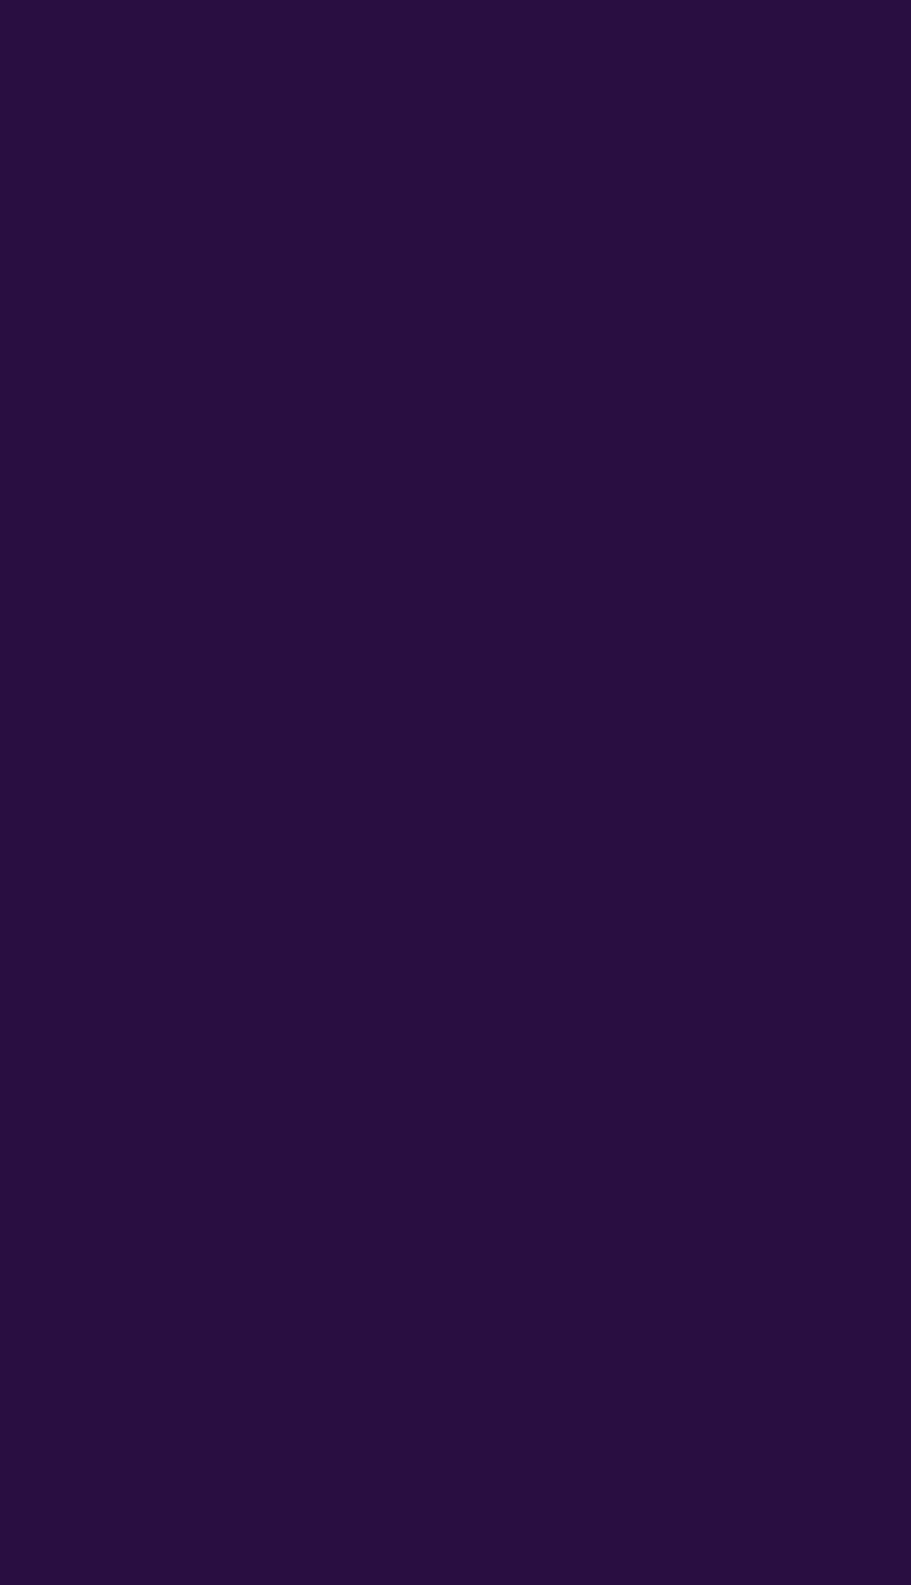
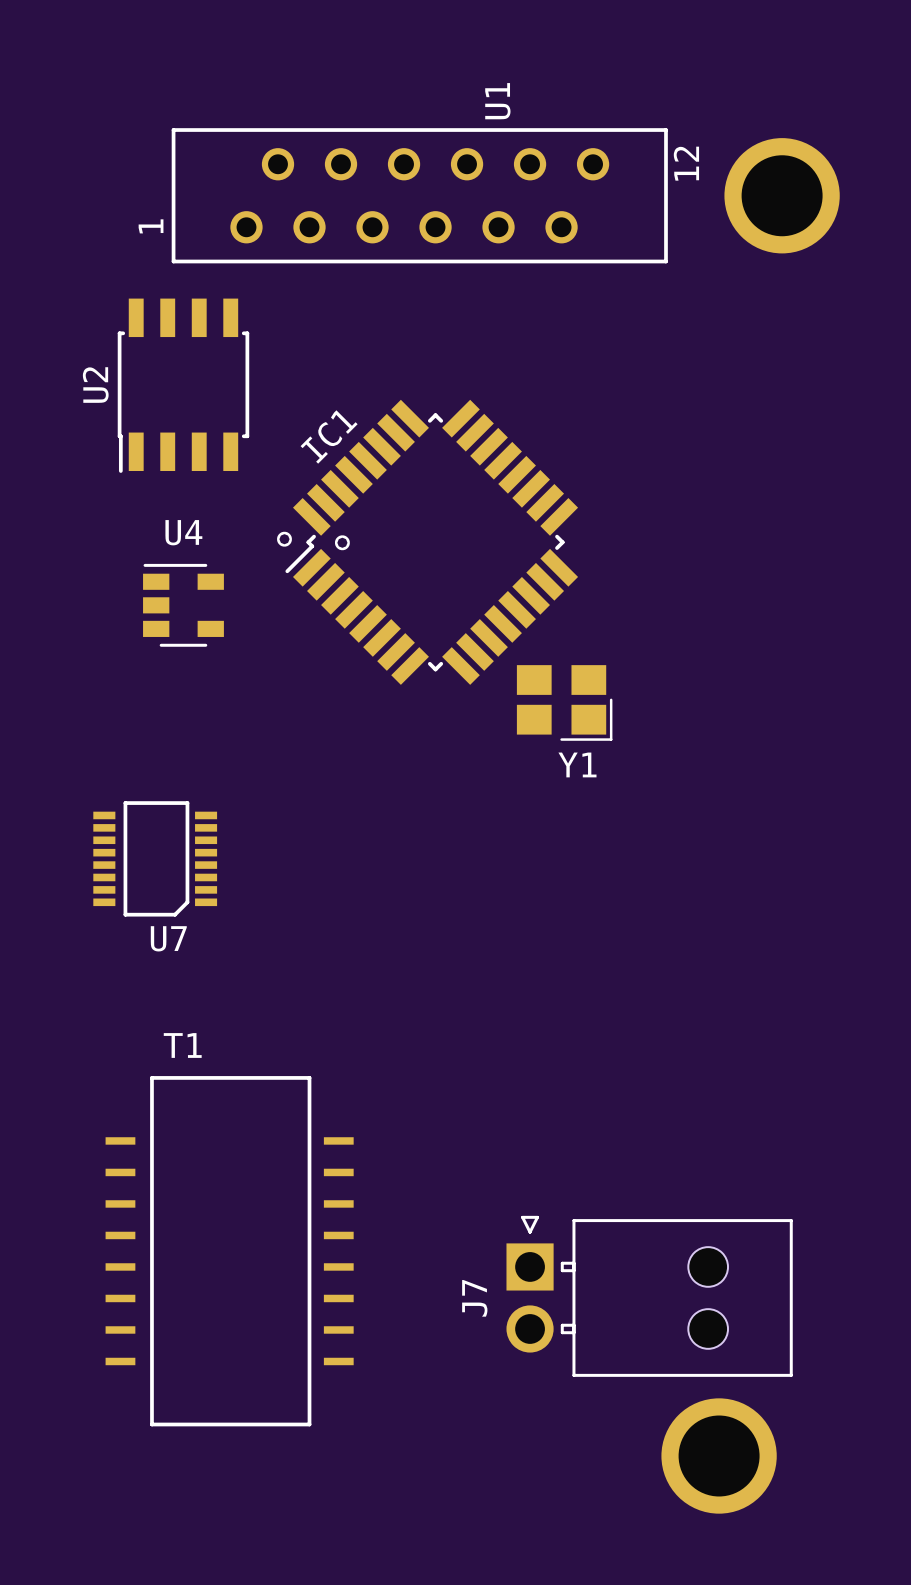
U1: none -> (419, 195)
part: none -> (782, 195)
U2: none -> (183, 385)
IC1: none -> (427, 542)
U4: none -> (183, 605)
Y1: none -> (564, 702)
U7: none -> (155, 858)
T1: none -> (229, 1251)
J7: none -> (649, 1296)
part: none -> (719, 1456)

